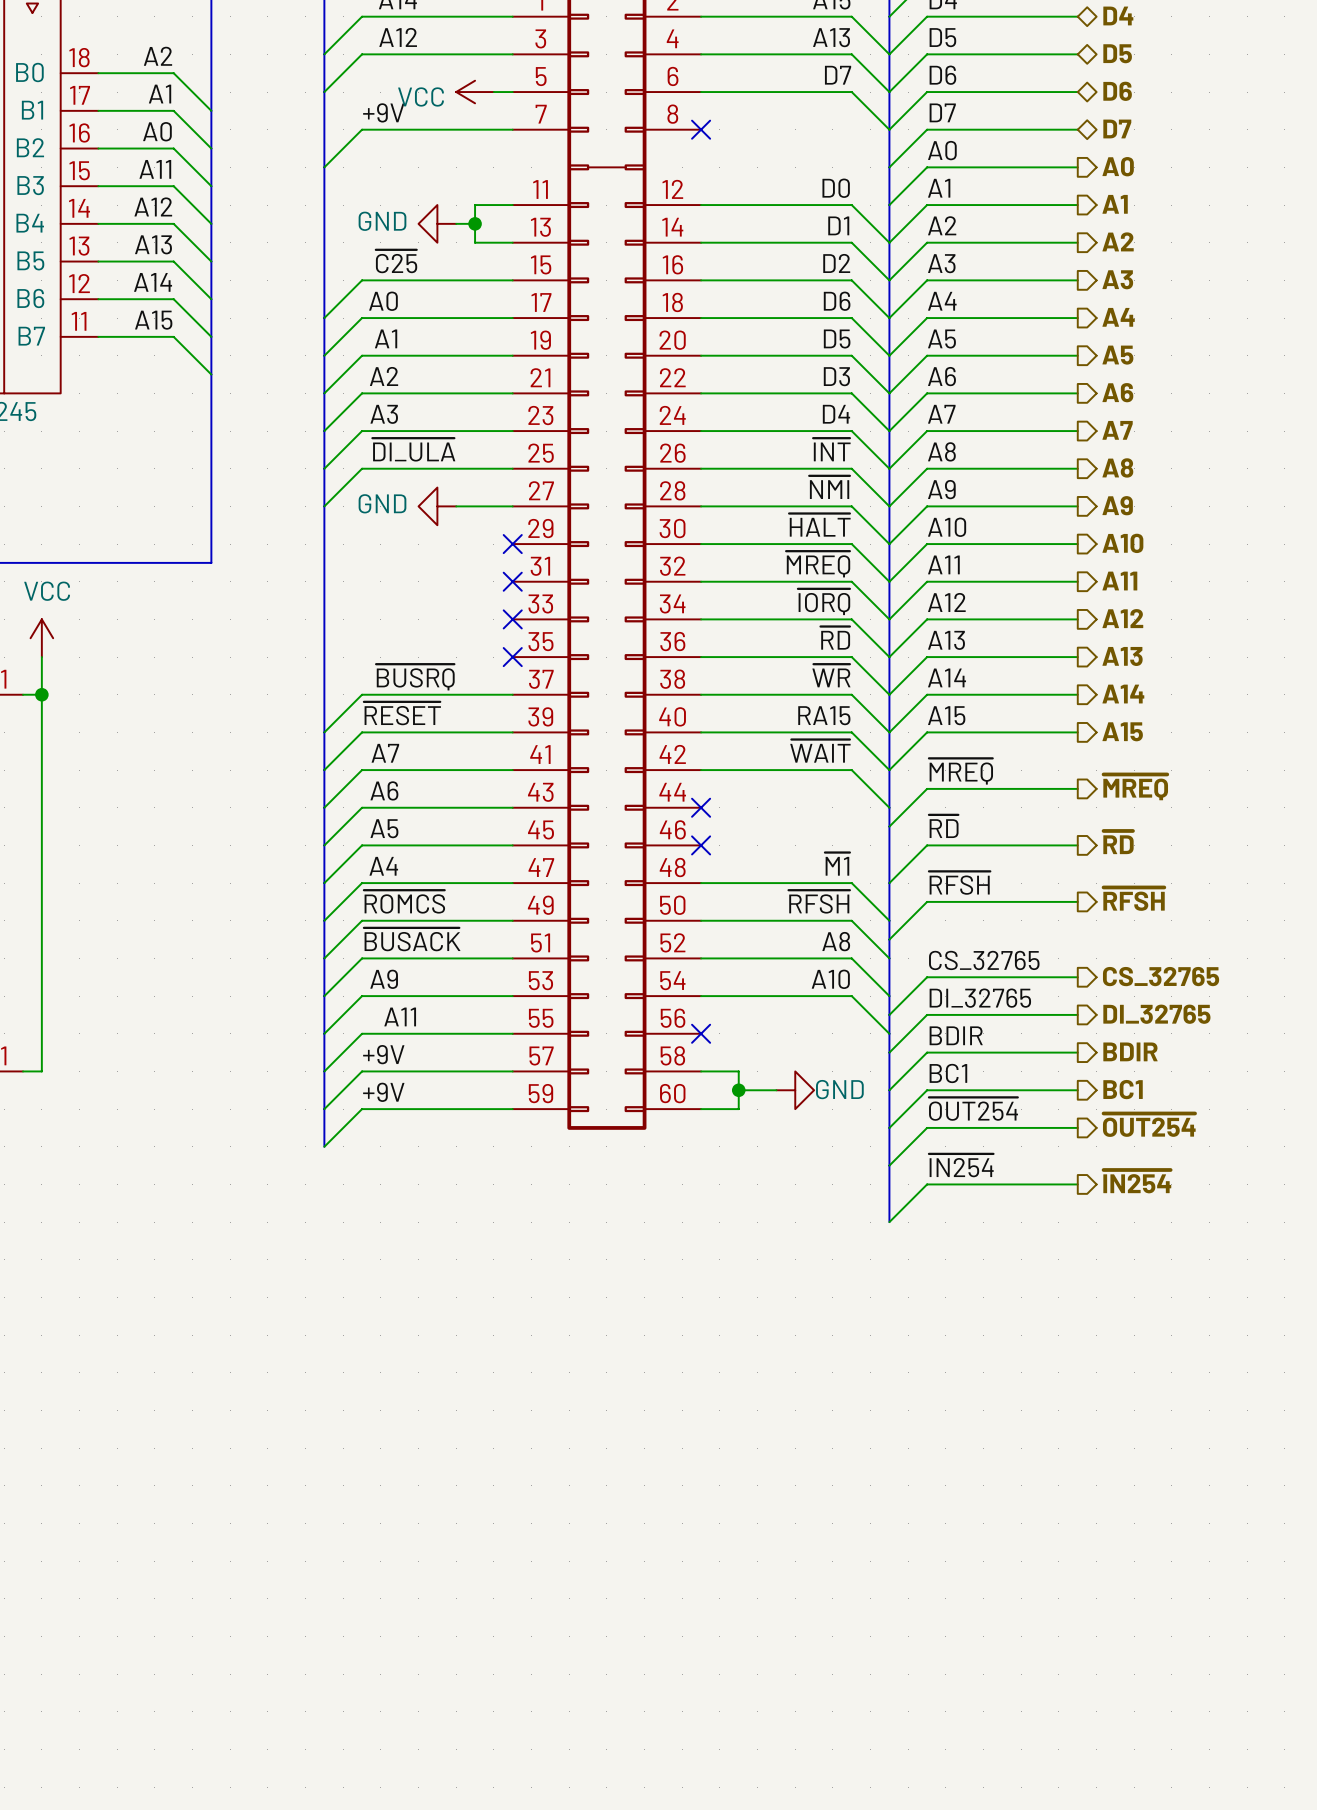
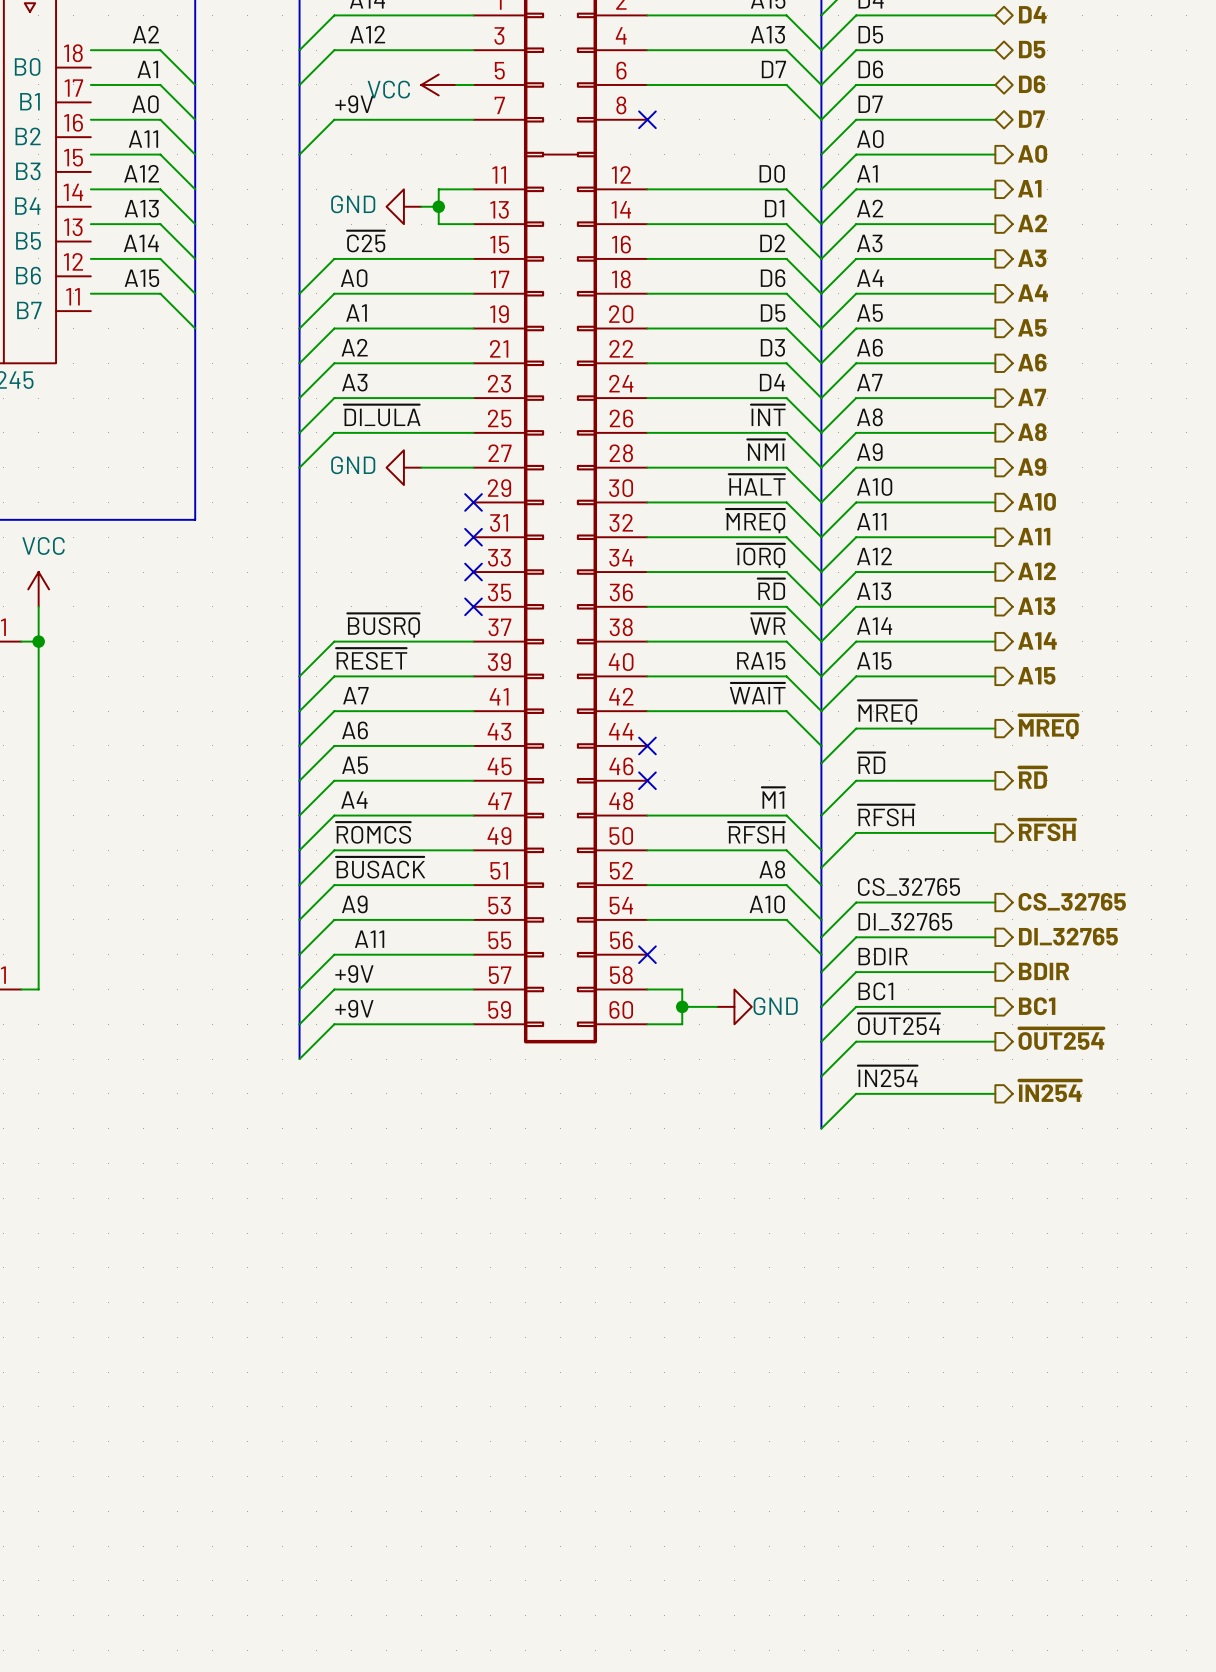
label position: A2 (157, 56) -> A2 (145, 34)
wire: (98, 73) (173, 73) (211, 110) -> (90, 50) (160, 50) (195, 84)
label position: A1 (160, 94) -> A1 (147, 69)
wire: (98, 110) (173, 110) (211, 148) -> (90, 84) (160, 84) (195, 119)
label position: A0 (157, 131) -> A0 (145, 104)
wire: (98, 148) (173, 148) (211, 186) -> (90, 119) (160, 119) (195, 154)
label position: A11 (155, 169) -> A11 (143, 139)
wire: (98, 186) (173, 186) (211, 223) -> (90, 154) (160, 154) (195, 189)
label position: A12 (153, 206) -> A12 (141, 173)
wire: (98, 223) (173, 223) (211, 261) -> (90, 189) (160, 189) (195, 224)
label position: A13 (153, 244) -> A13 (141, 208)
wire: (98, 261) (173, 261) (211, 299) -> (90, 224) (160, 224) (195, 258)
label position: A14 (153, 282) -> A14 (141, 243)
wire: (98, 299) (173, 299) (211, 336) -> (90, 258) (160, 258) (195, 293)
label position: A15 (153, 320) -> A15 (141, 278)
wire: (98, 336) (173, 336) (211, 374) -> (90, 293) (160, 293) (195, 328)

